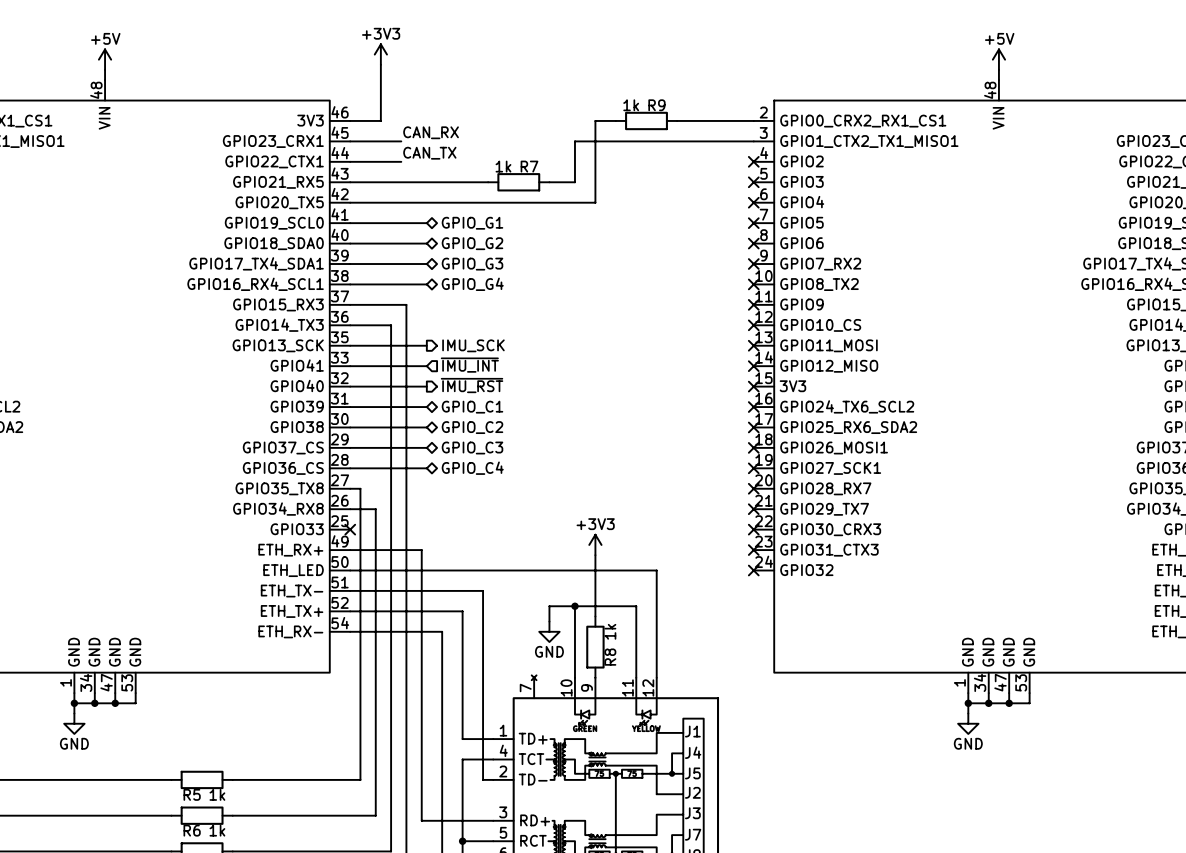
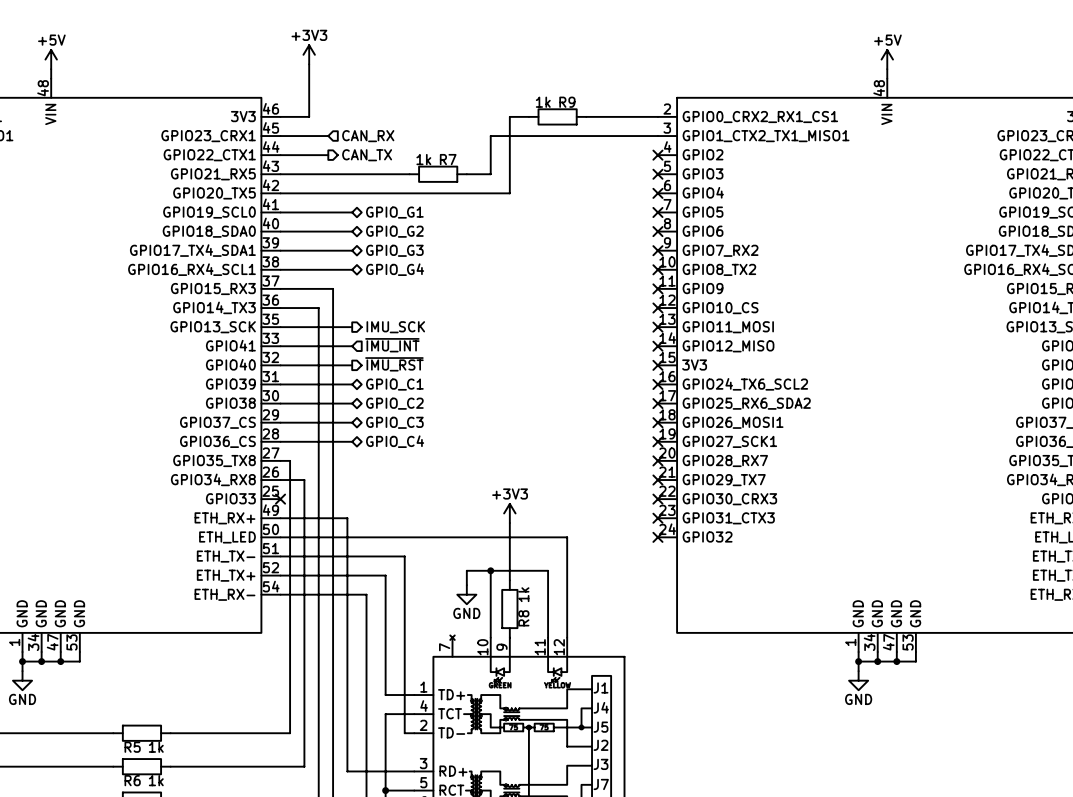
label: CAN_RX (431, 132) -> none
hierarchical label: none -> CAN_RX (368, 136)
label: CAN_TX (429, 153) -> none
hierarchical label: none -> CAN_TX (367, 155)

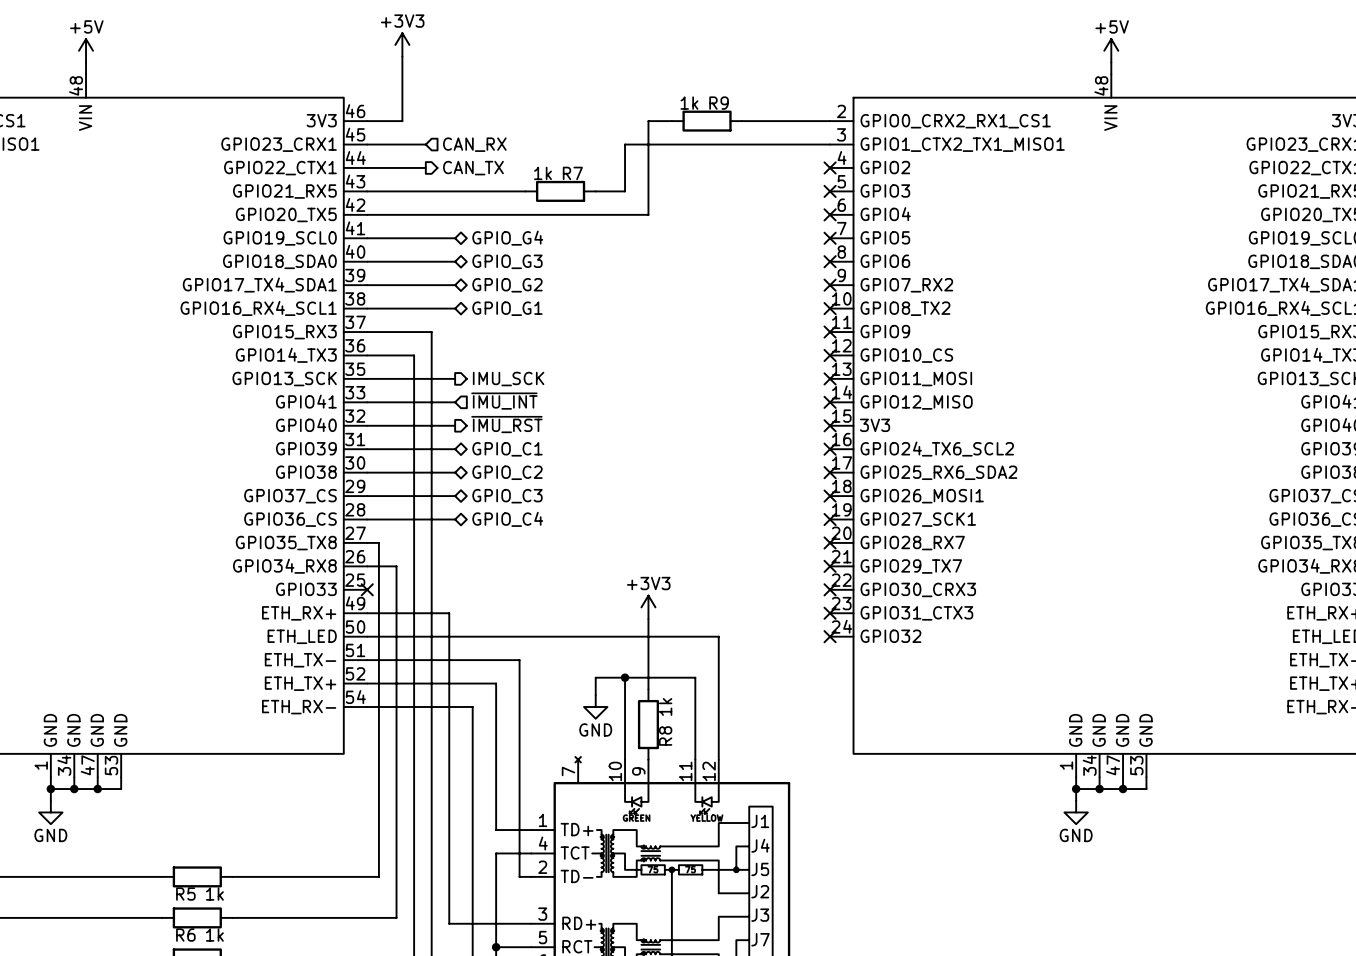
hierarchical label: GPIO_G1 (394, 212) -> GPIO_G4 (507, 238)
hierarchical label: GPIO_G2 (394, 231) -> GPIO_G3 (507, 261)
hierarchical label: GPIO_G3 (394, 250) -> GPIO_G2 (507, 285)
hierarchical label: GPIO_G4 (395, 269) -> GPIO_G1 (507, 308)

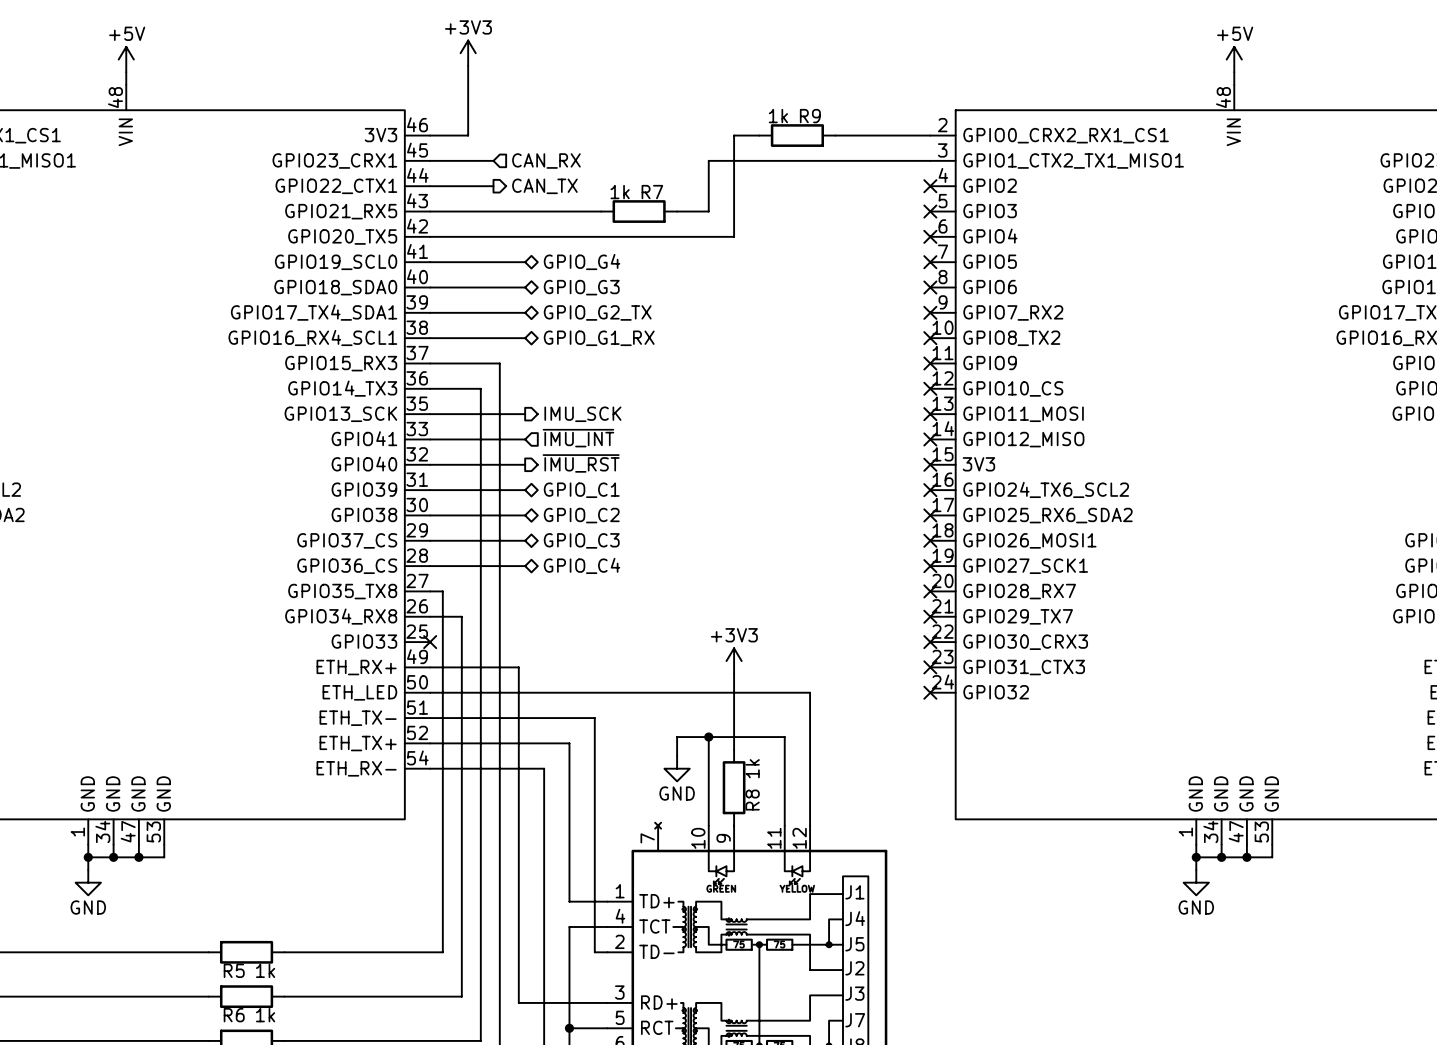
hierarchical label: GPIO_G2 (507, 285) -> GPIO_G2_TX (597, 312)
hierarchical label: GPIO_G1 (507, 308) -> GPIO_G1_RX (599, 338)

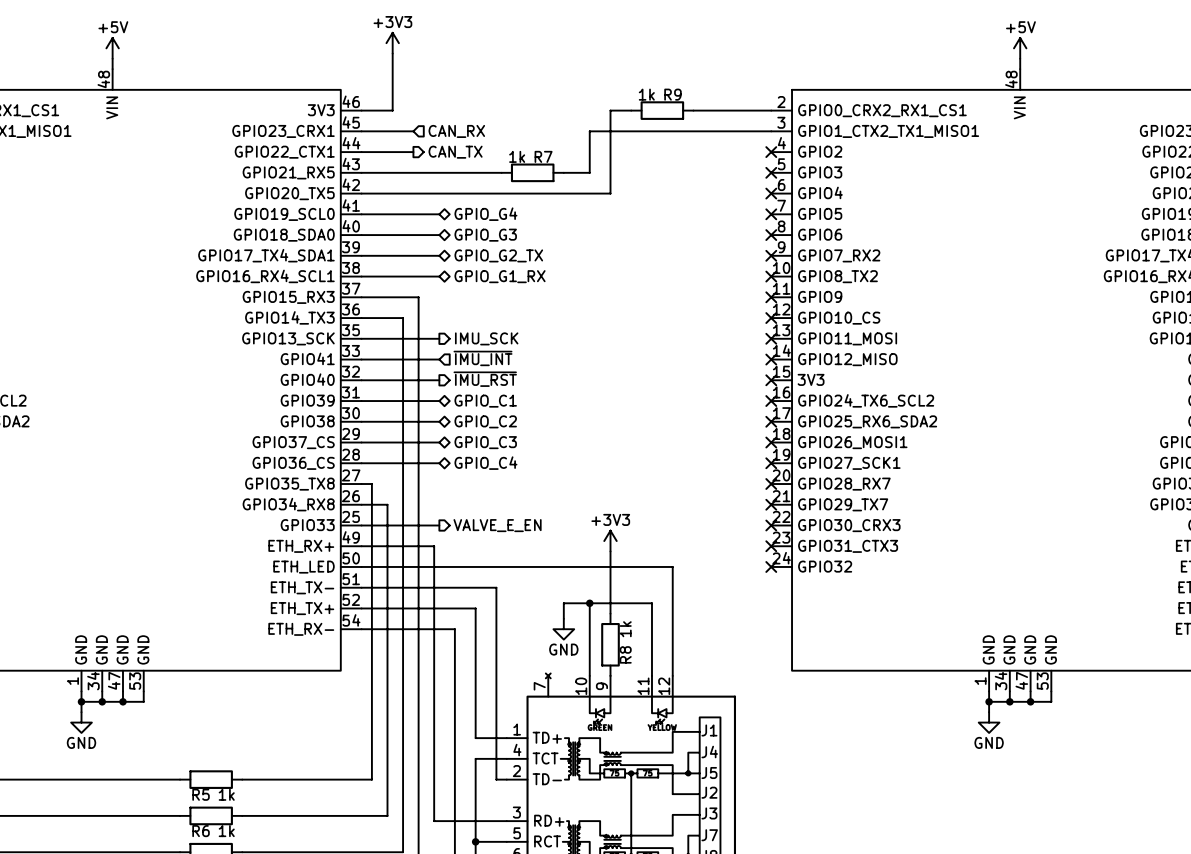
wire: none -> (361, 525) (439, 525)
no-connect mark: (430, 642) -> none
hierarchical label: none -> VALVE_E_EN (497, 525)

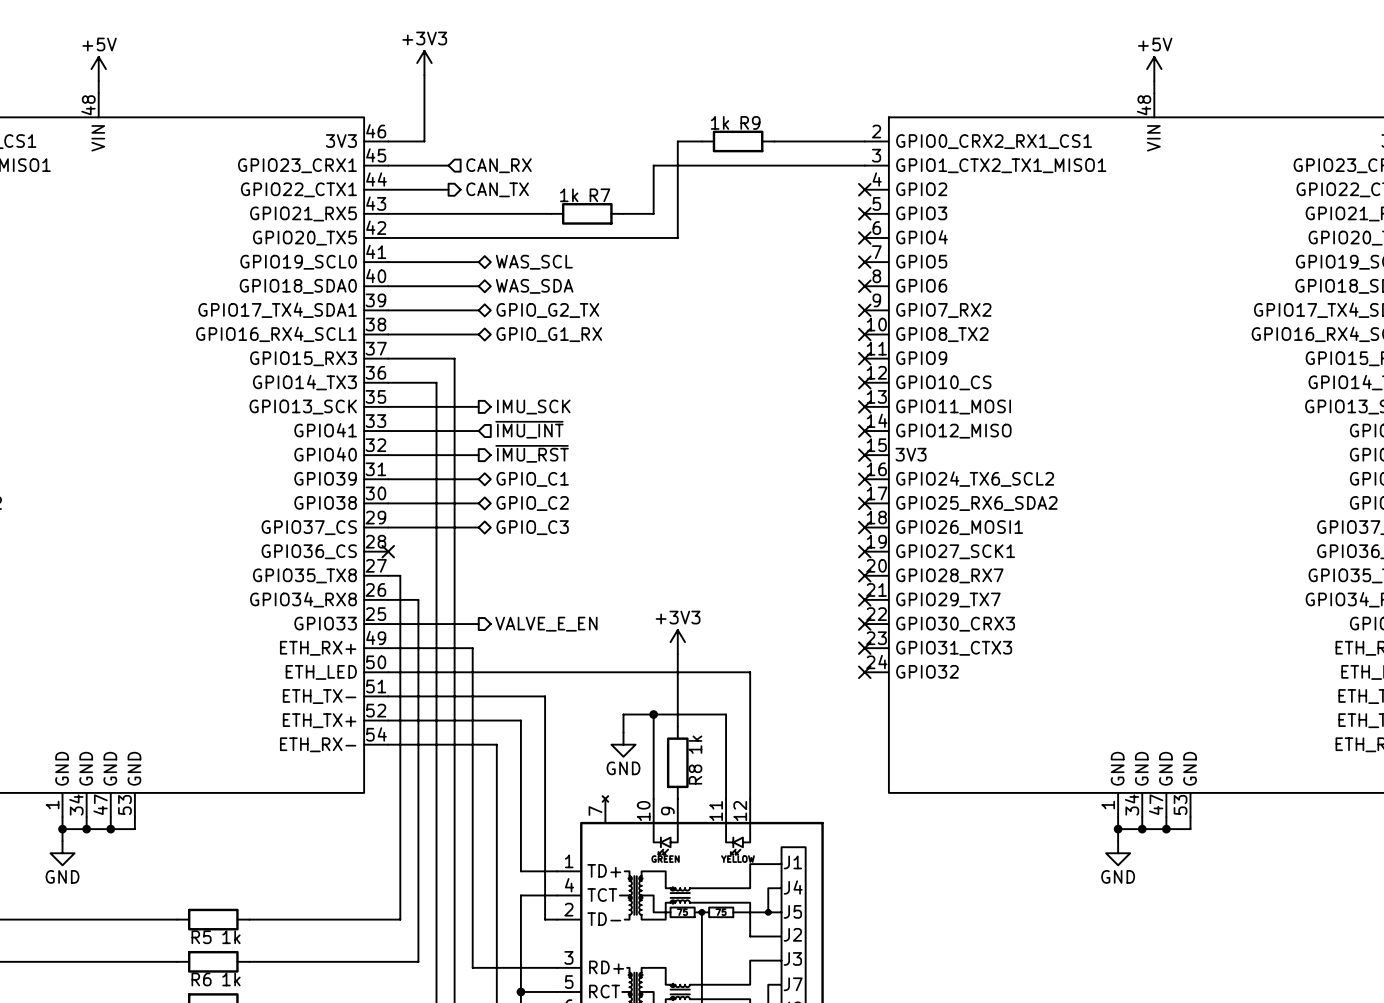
hierarchical label: GPIO_G4 (485, 214) -> WAS_SCL (534, 262)
hierarchical label: GPIO_G3 (485, 235) -> WAS_SDA (534, 286)
wire: (361, 463) (439, 463) -> none
no-connect mark: none -> (388, 551)
hierarchical label: GPIO_C4 (485, 463) -> none

